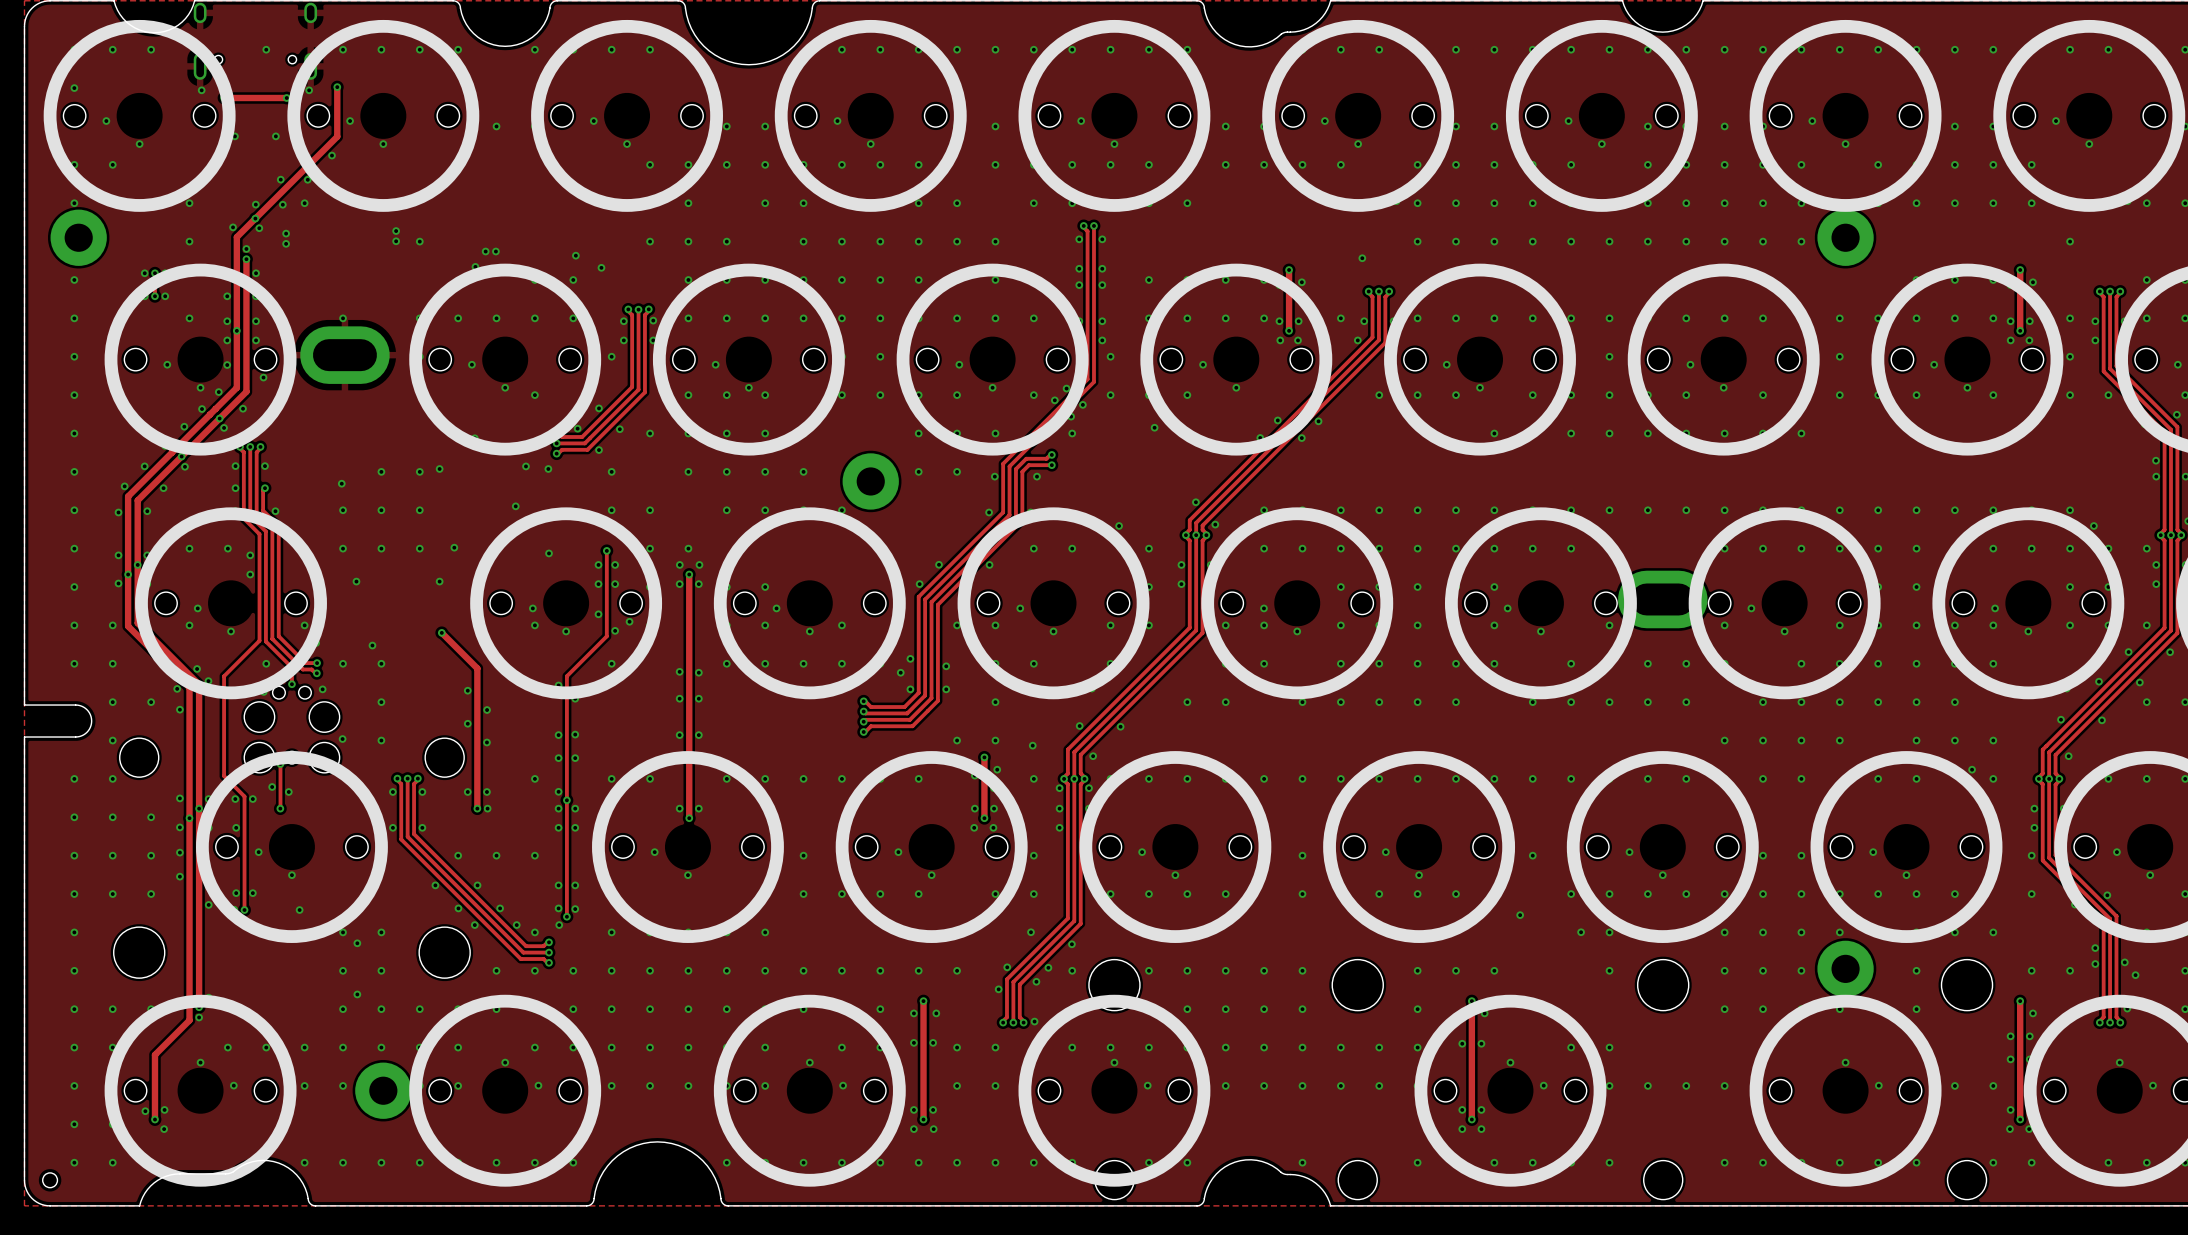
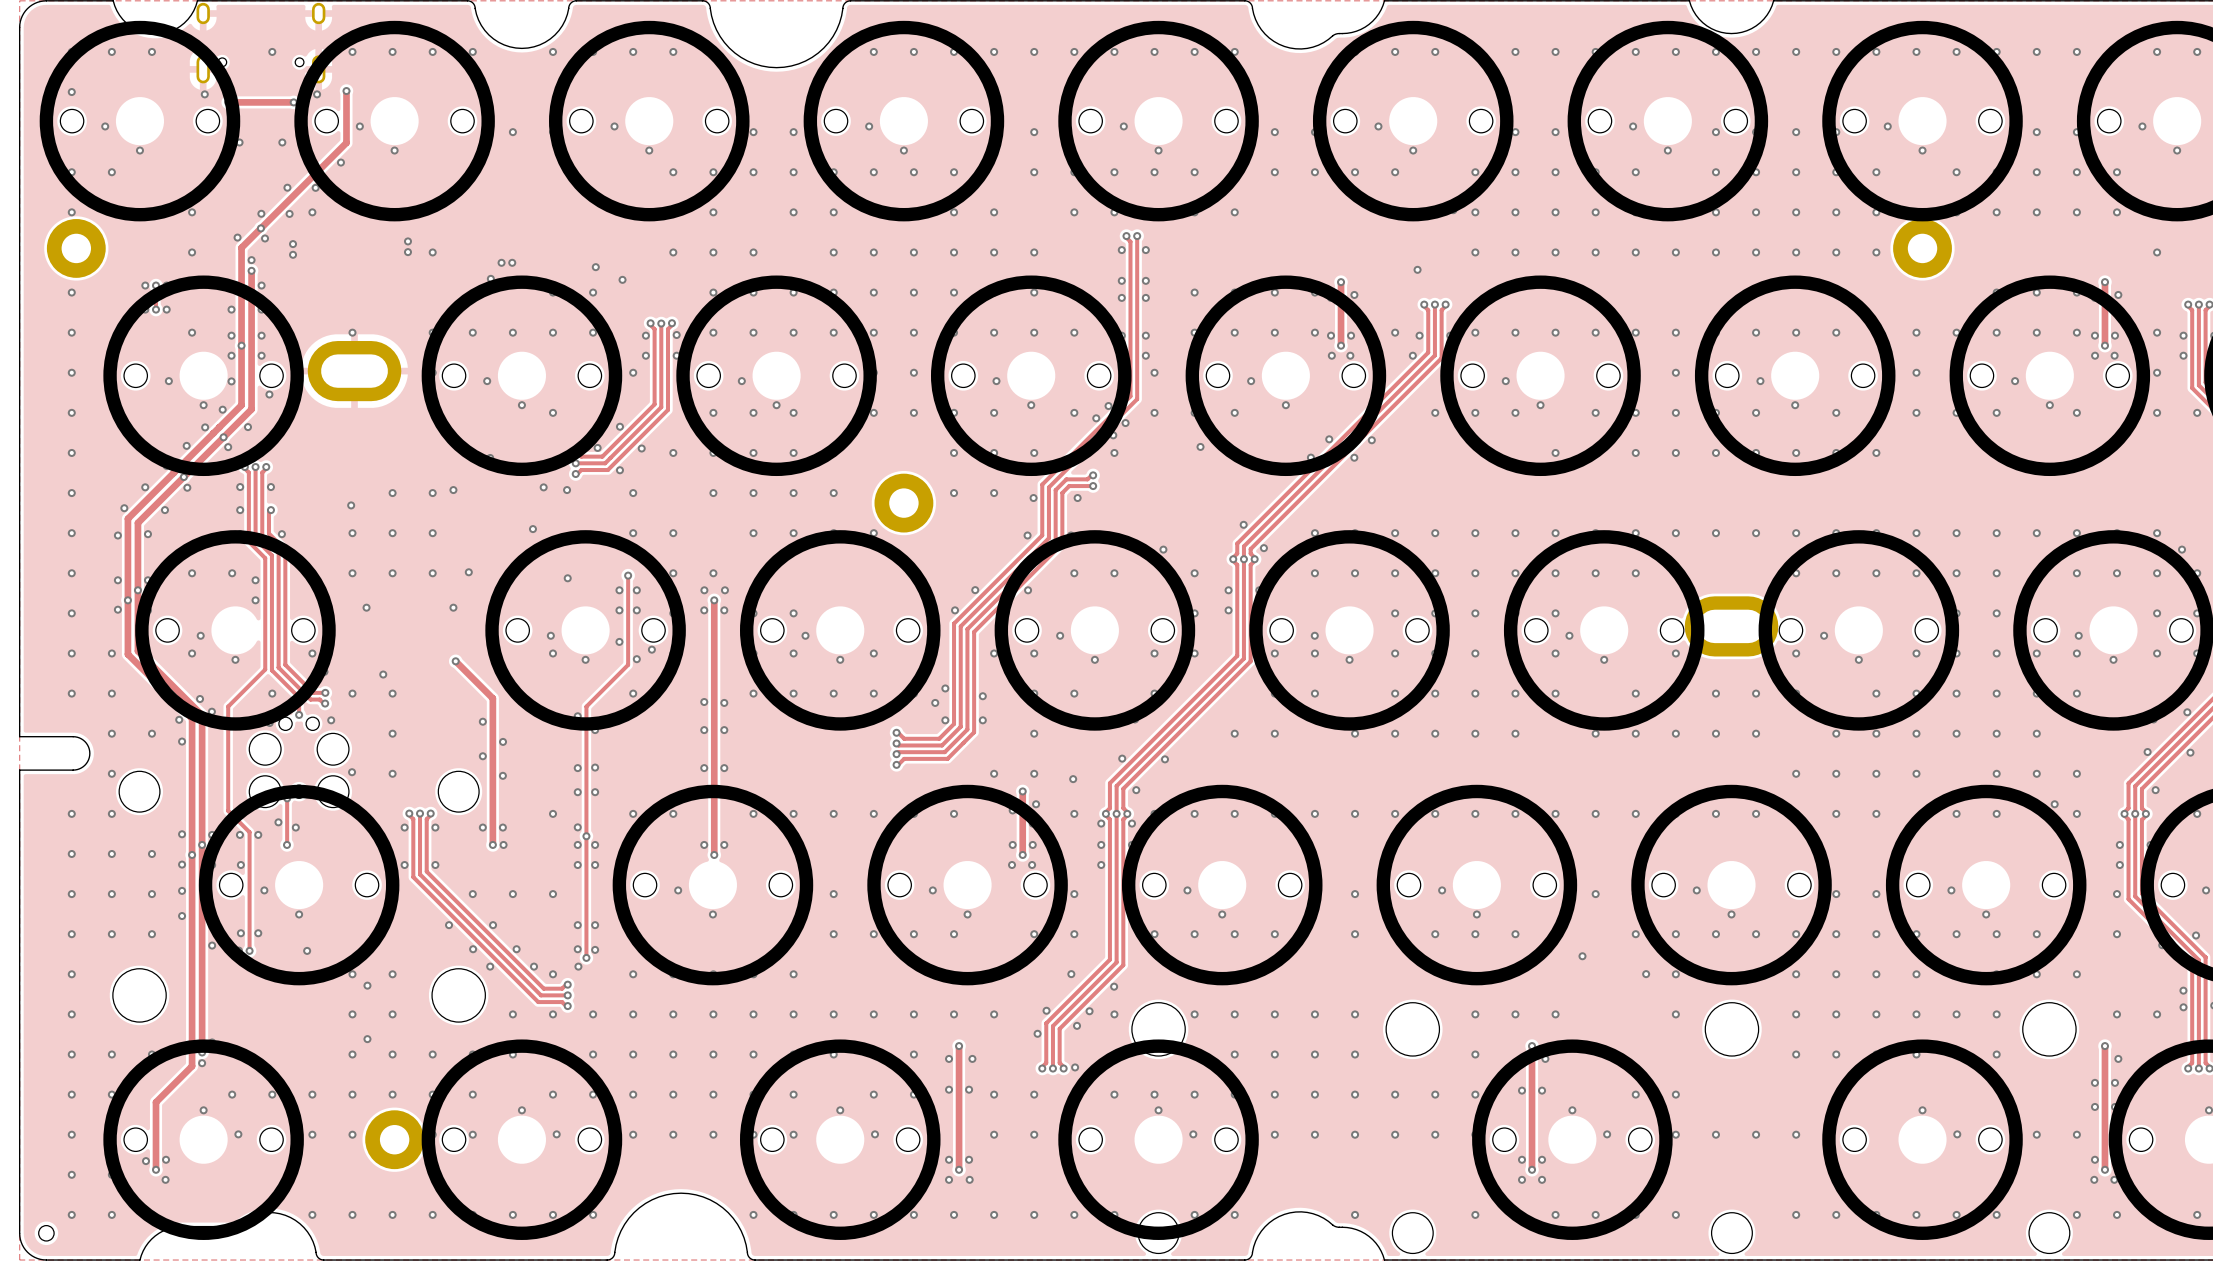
part: (1845, 968) -> none
via: none -> (1916, 1014)
via: none -> (1956, 1014)

